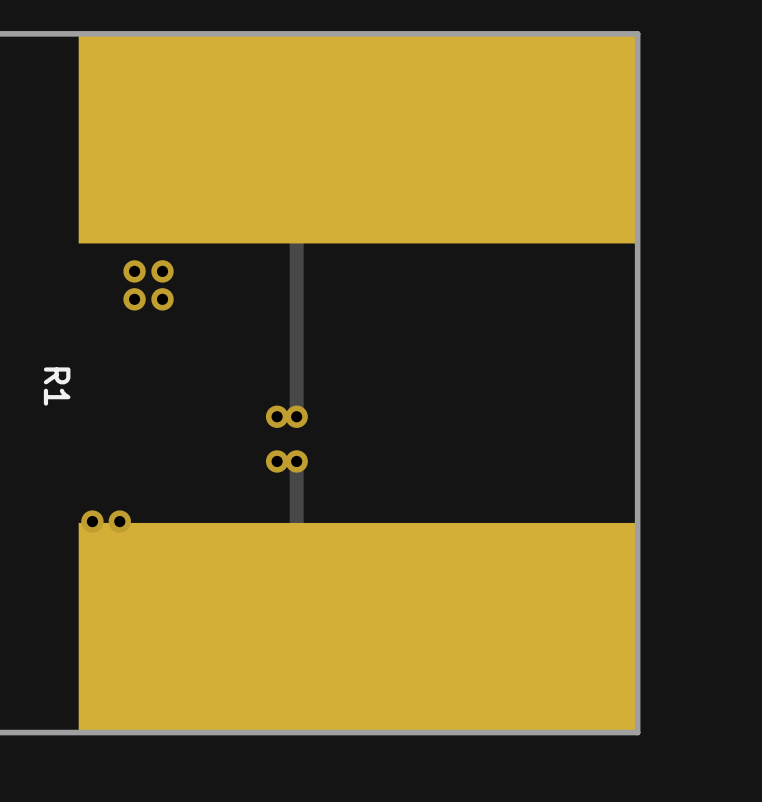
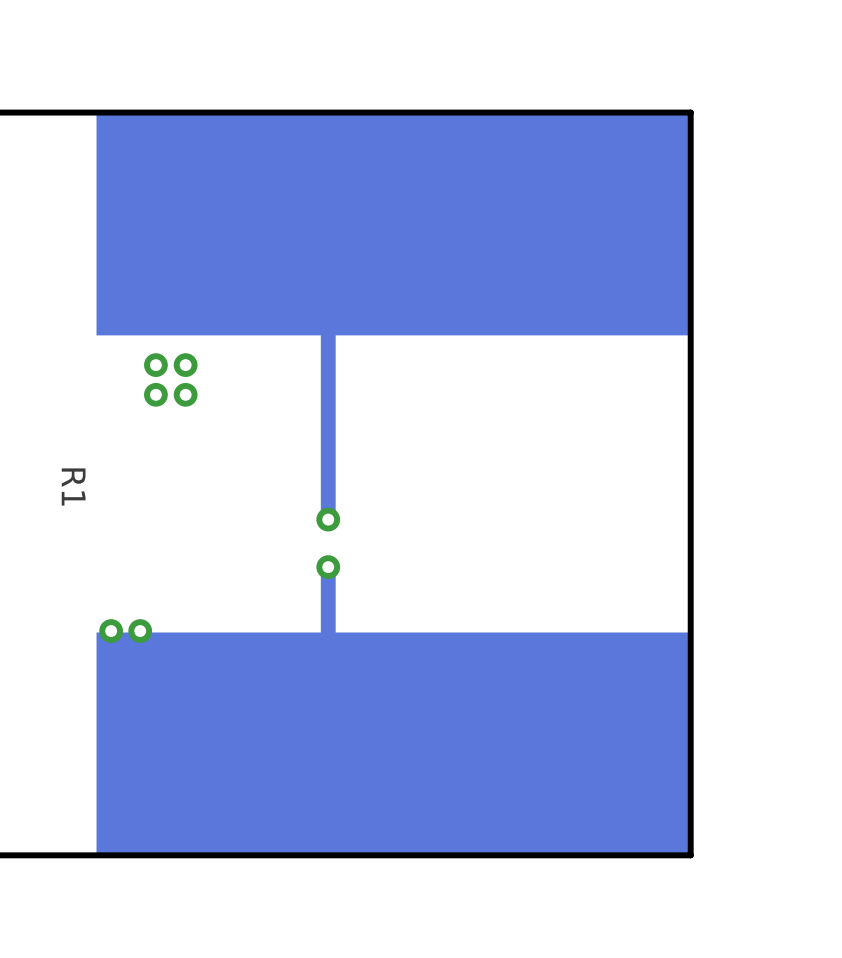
via: (277, 416) -> none
via: (277, 461) -> none

